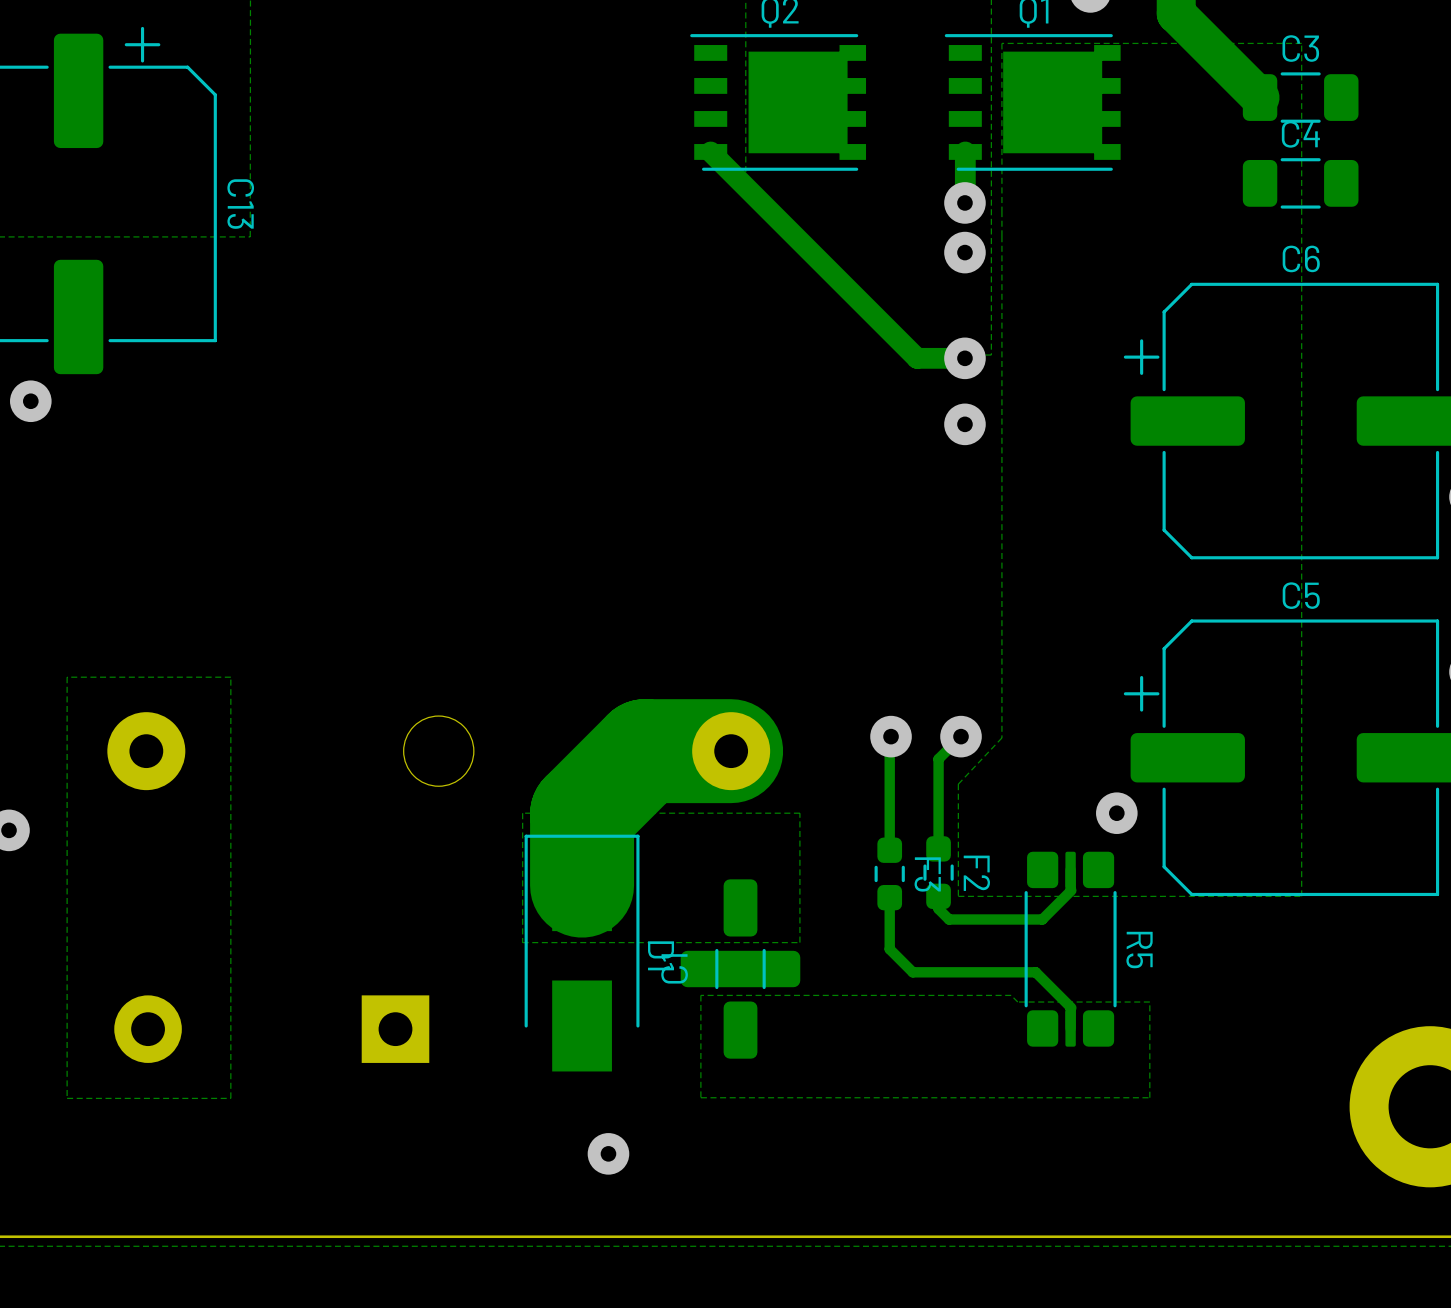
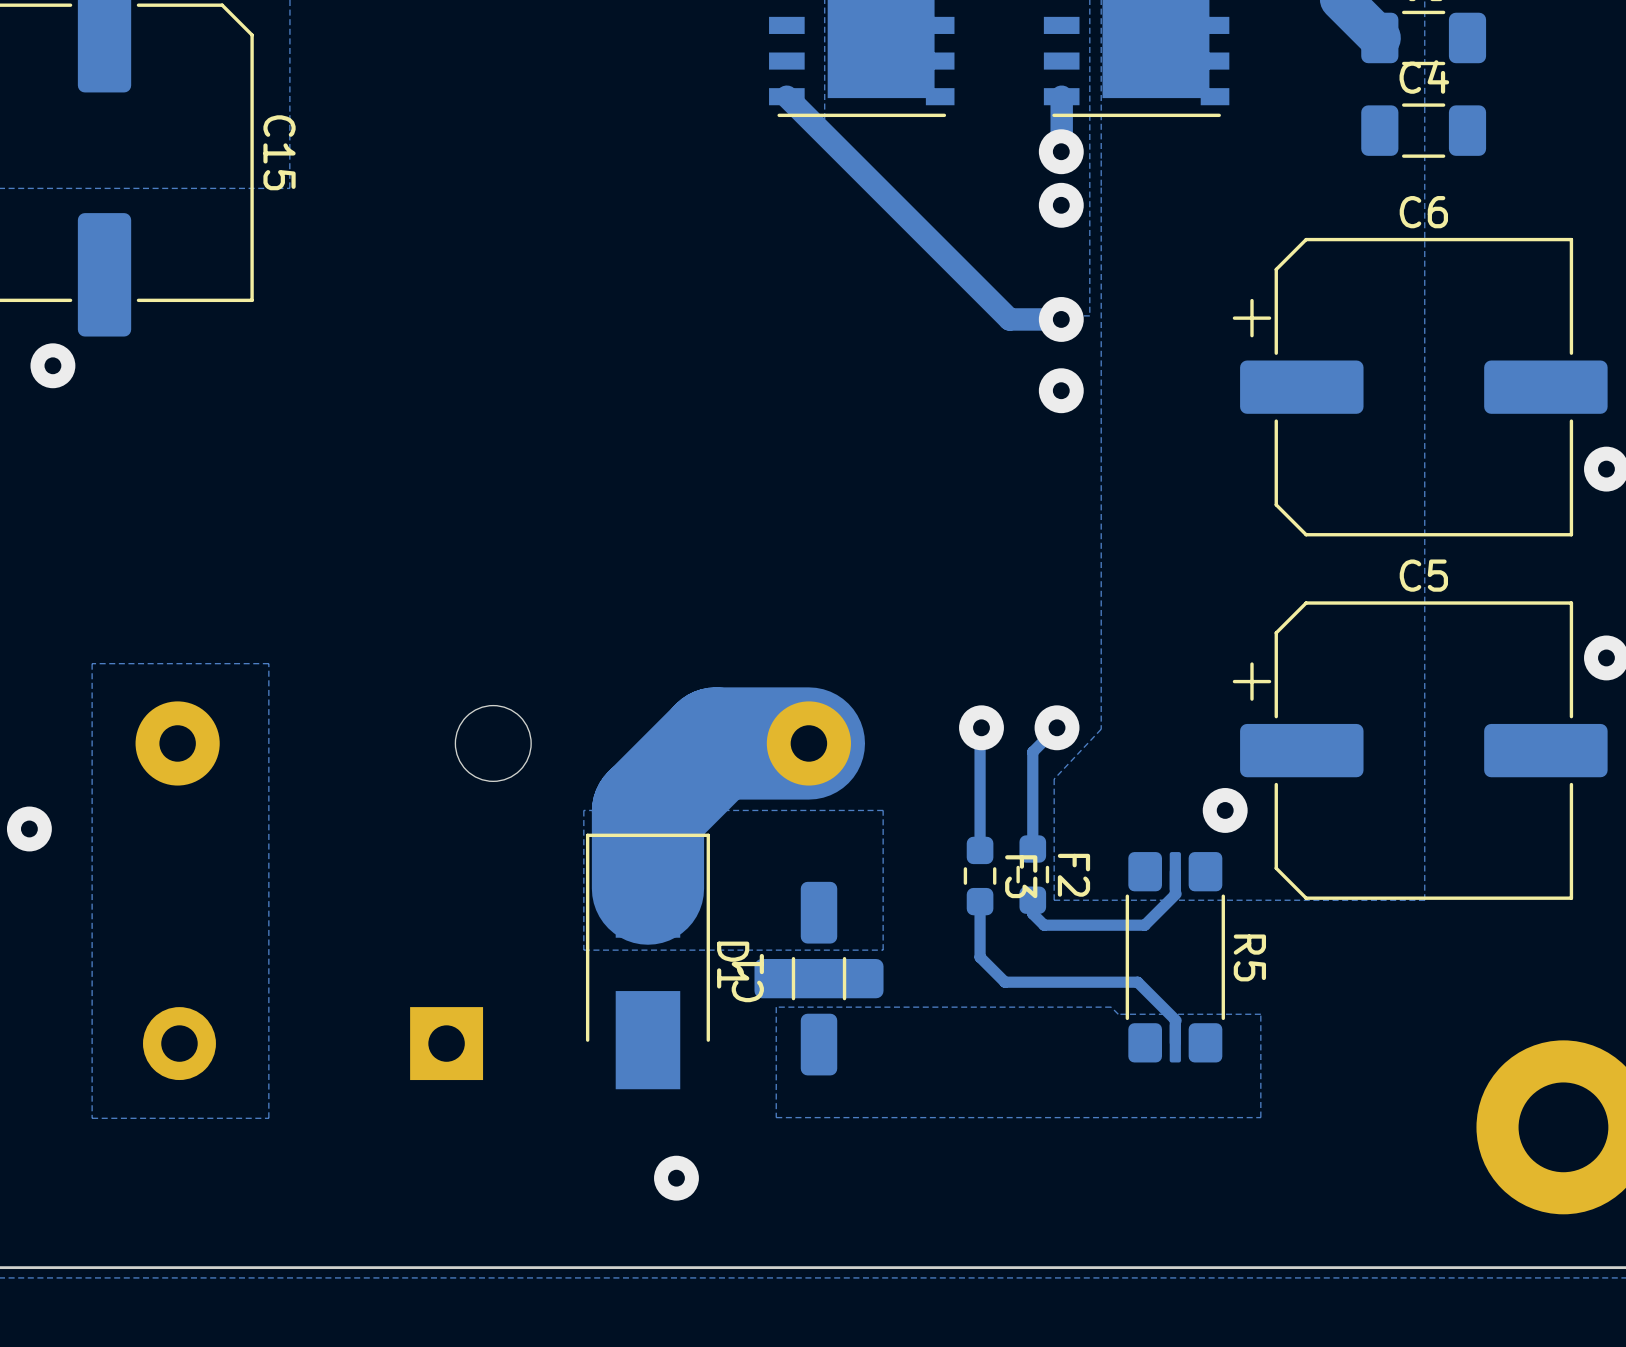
C13 name: C13 (240, 204) -> C15 (279, 152)

